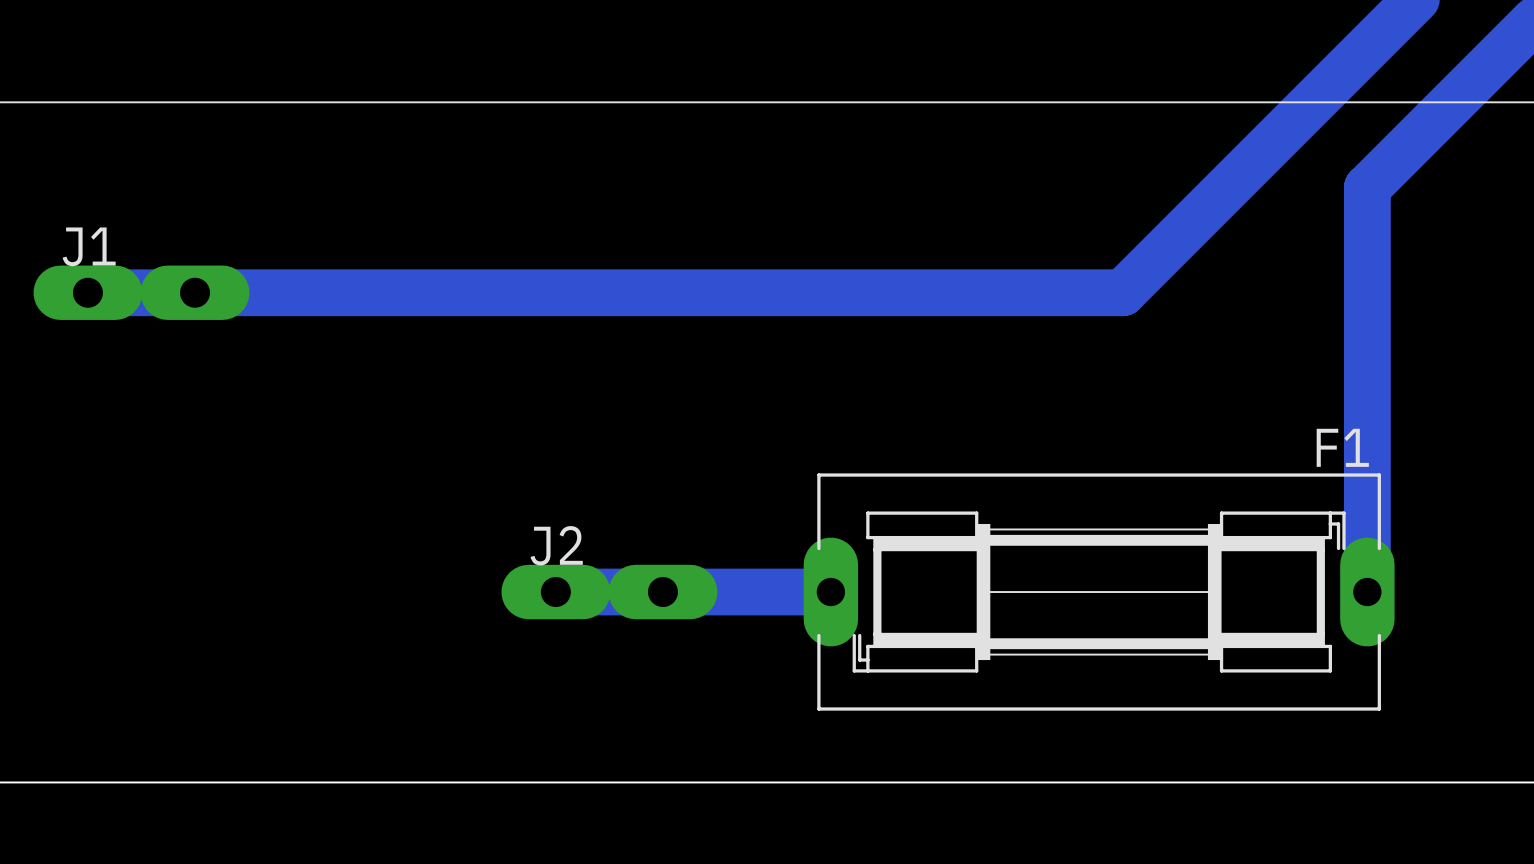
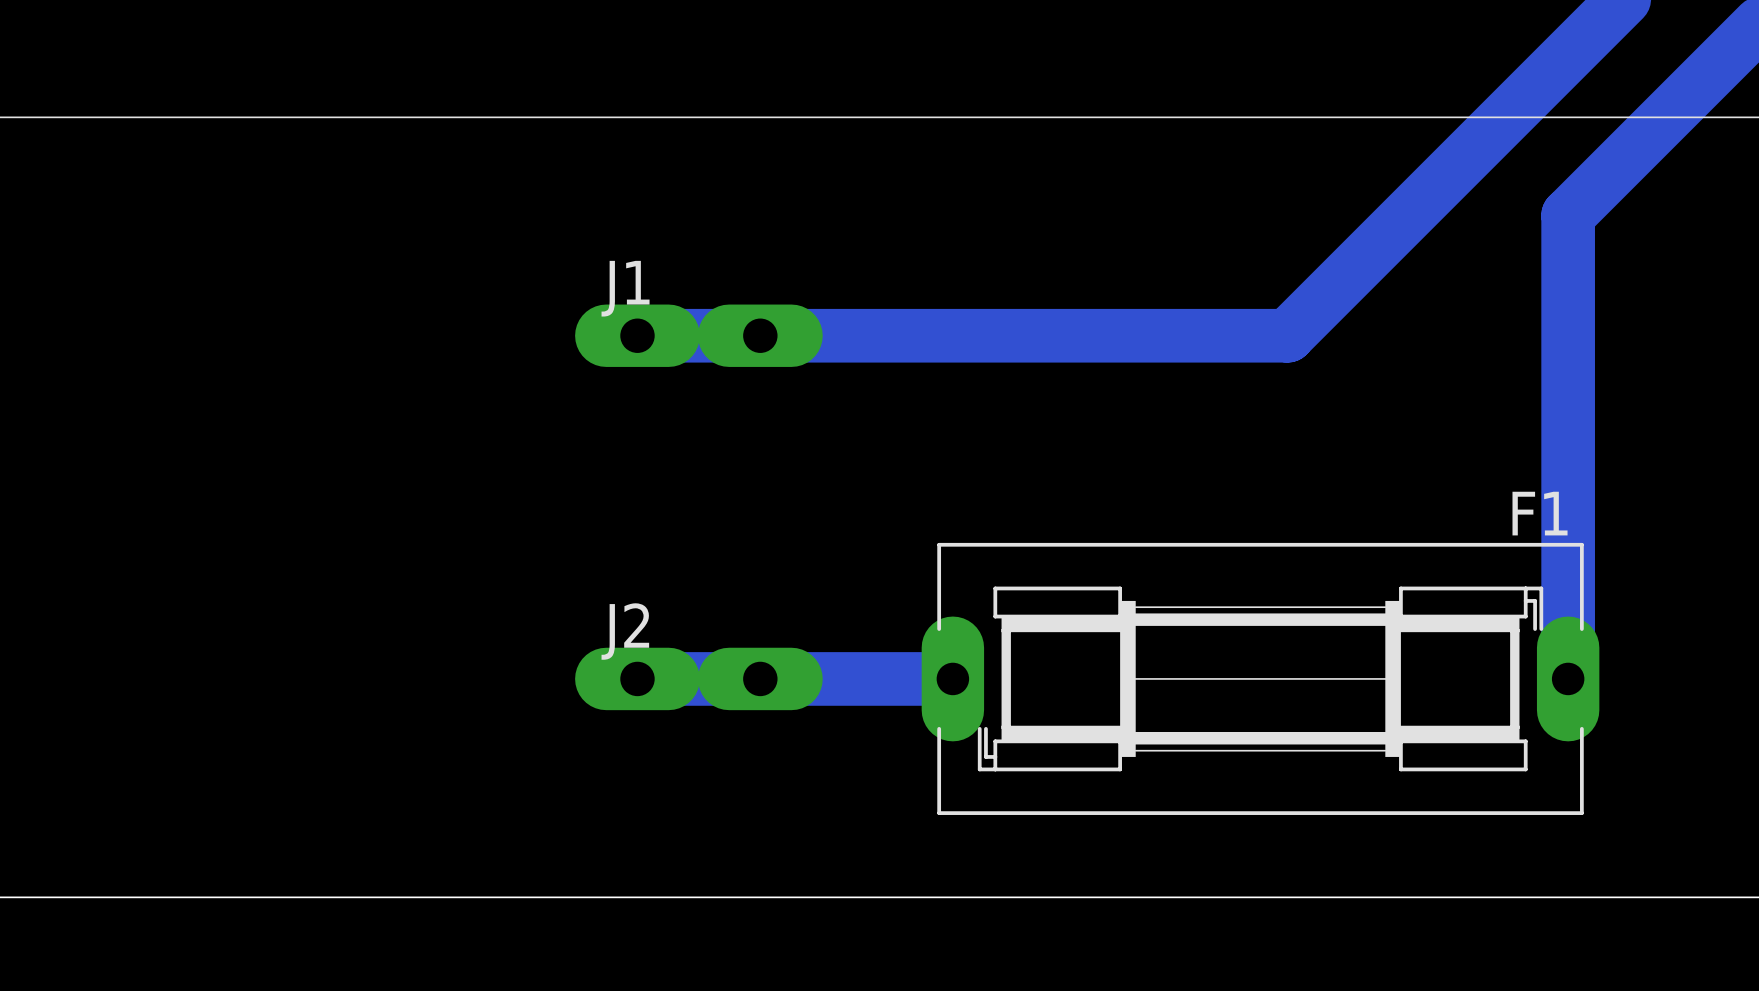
bottom track: (87, 292) (555, 292) -> none
J1 position: (141, 292) -> (698, 335)

